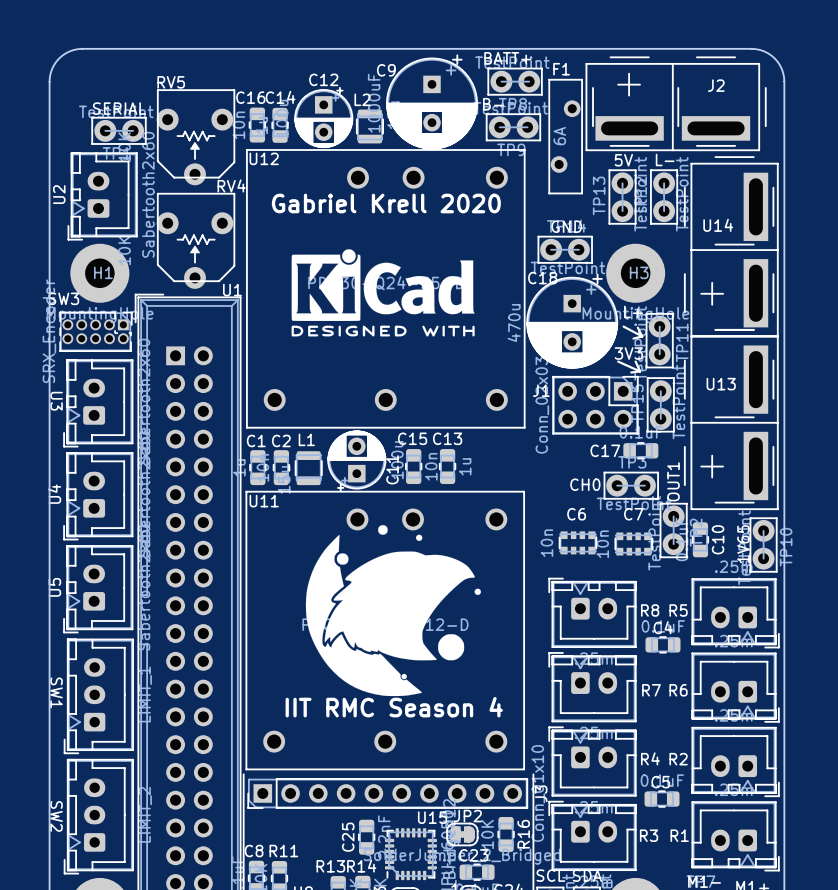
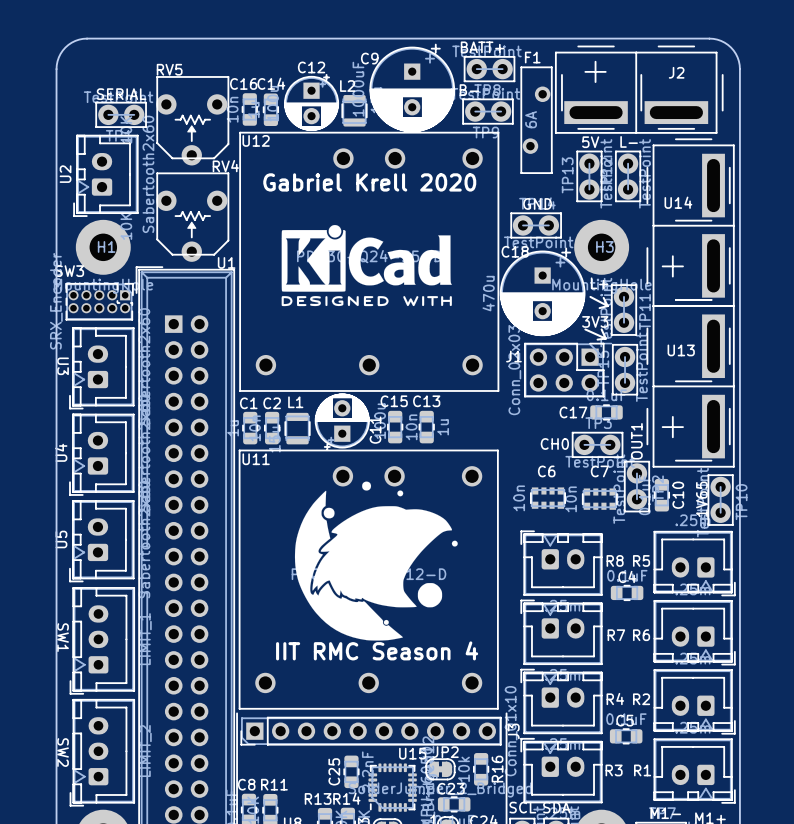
R16 value: 10K (487, 834) -> 10k (463, 769)

